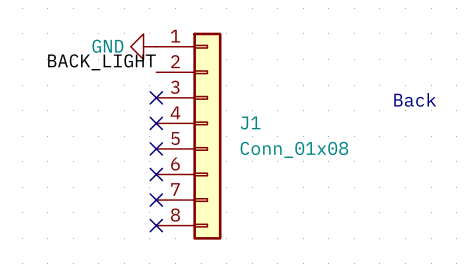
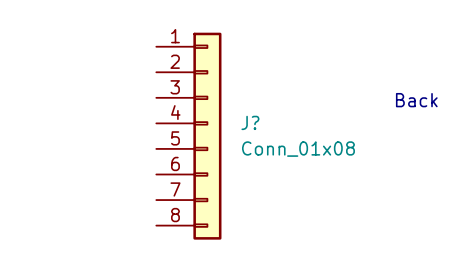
power symbol: GND (143, 46) -> none
label: BACK_LIGHT (101, 62) -> none
no-connect mark: (156, 97) -> none
no-connect mark: (156, 123) -> none
J1 name: J1 (250, 123) -> J? (250, 122)
no-connect mark: (156, 148) -> none
no-connect mark: (156, 174) -> none
no-connect mark: (156, 200) -> none
no-connect mark: (156, 225) -> none

